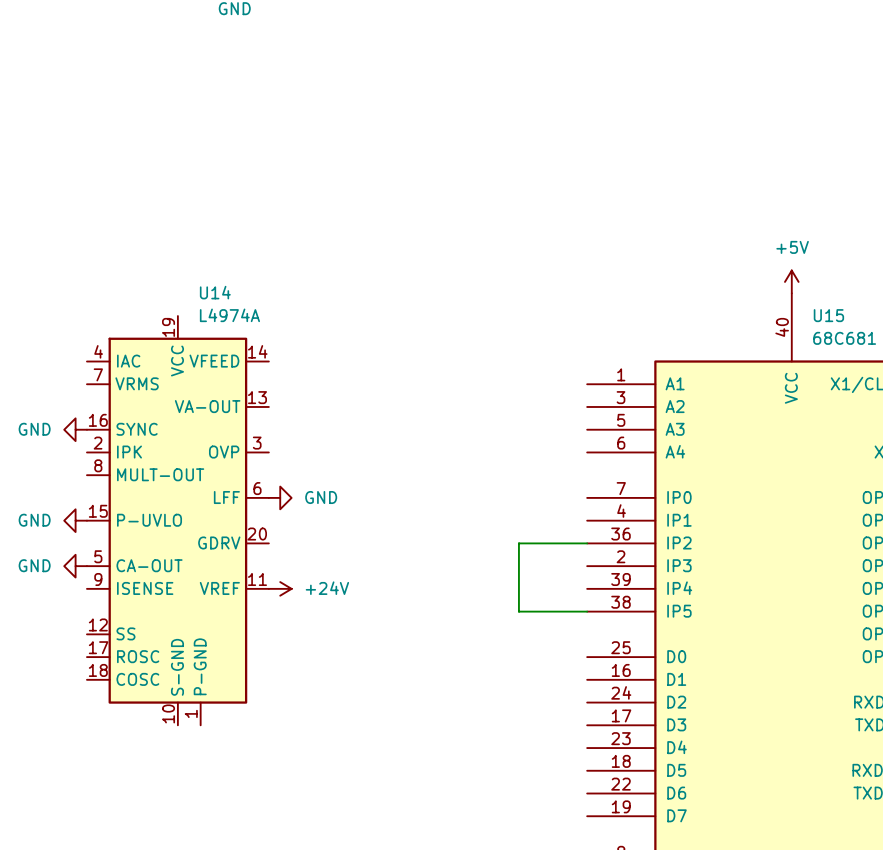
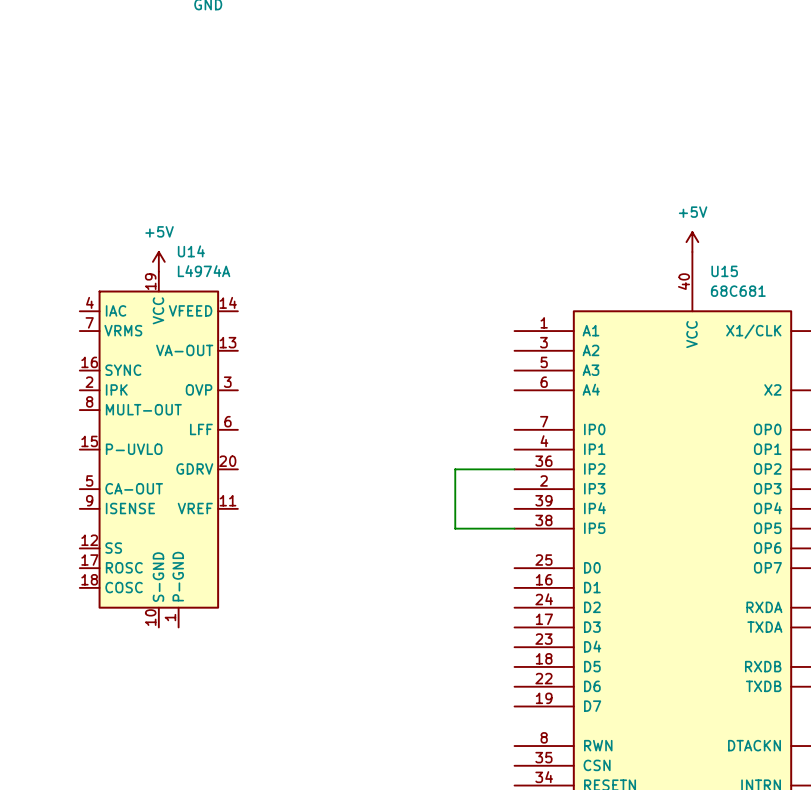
power symbol: none -> +5V (158, 261)
power symbol: GND (75, 429) -> none
power symbol: GND (280, 497) -> none
power symbol: GND (75, 520) -> none
power symbol: GND (75, 566) -> none
power symbol: +24V (280, 588) -> none

